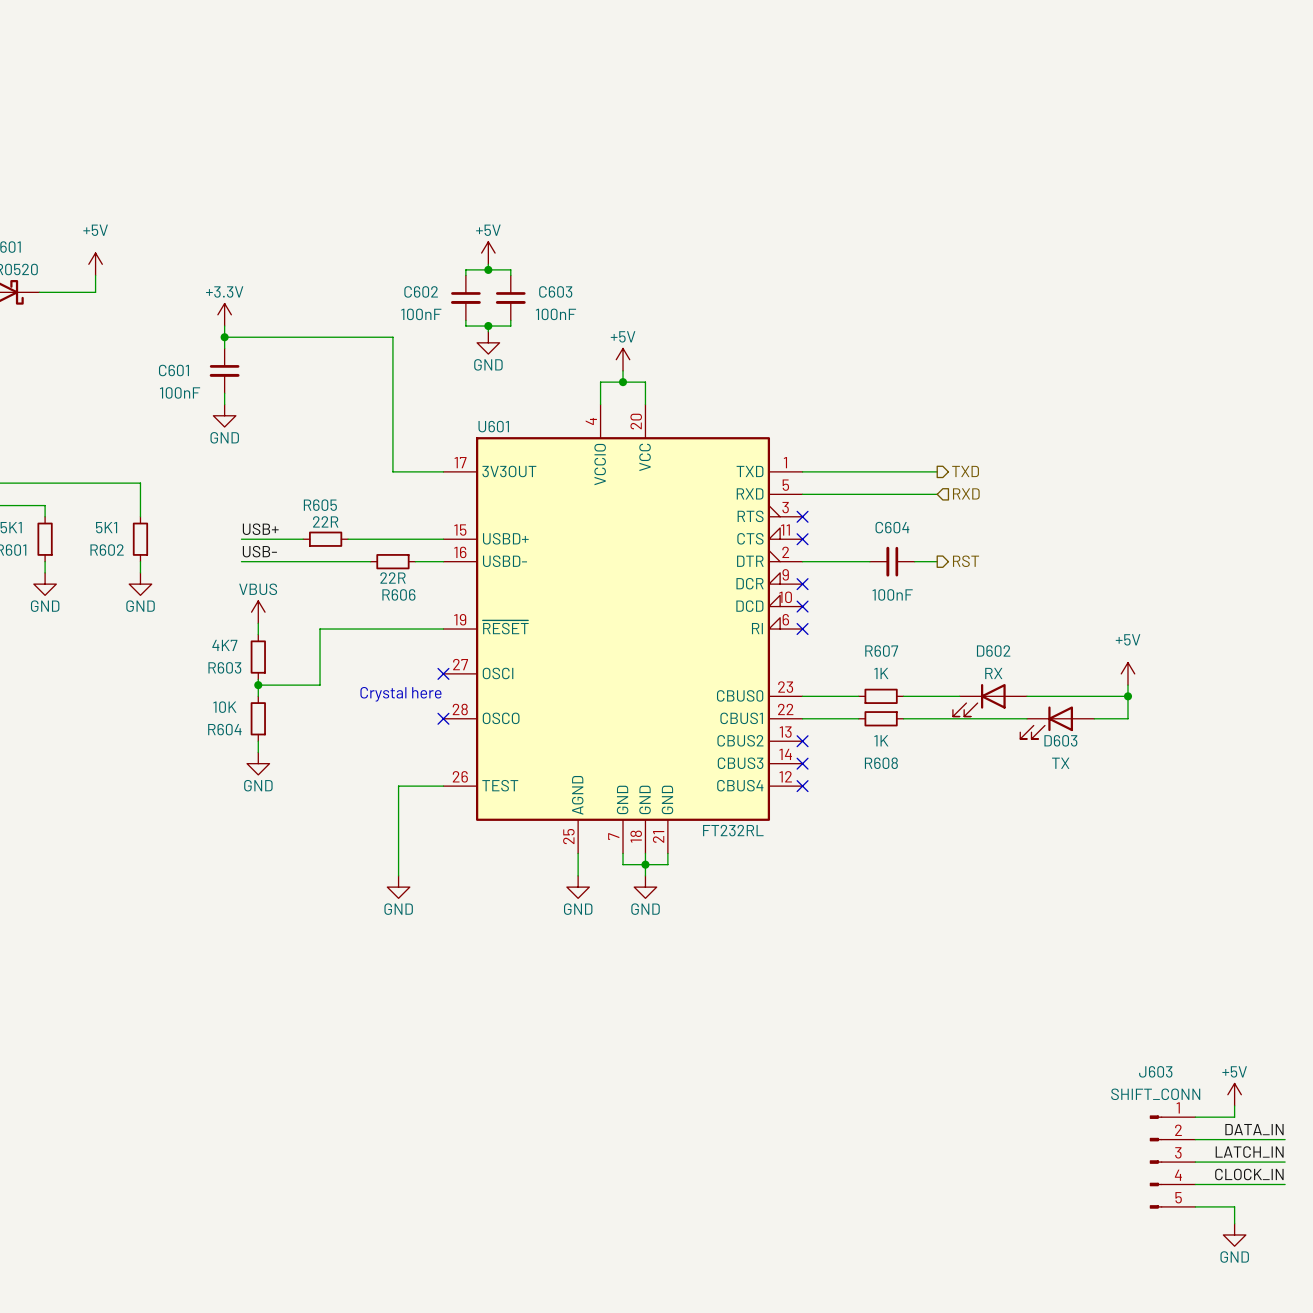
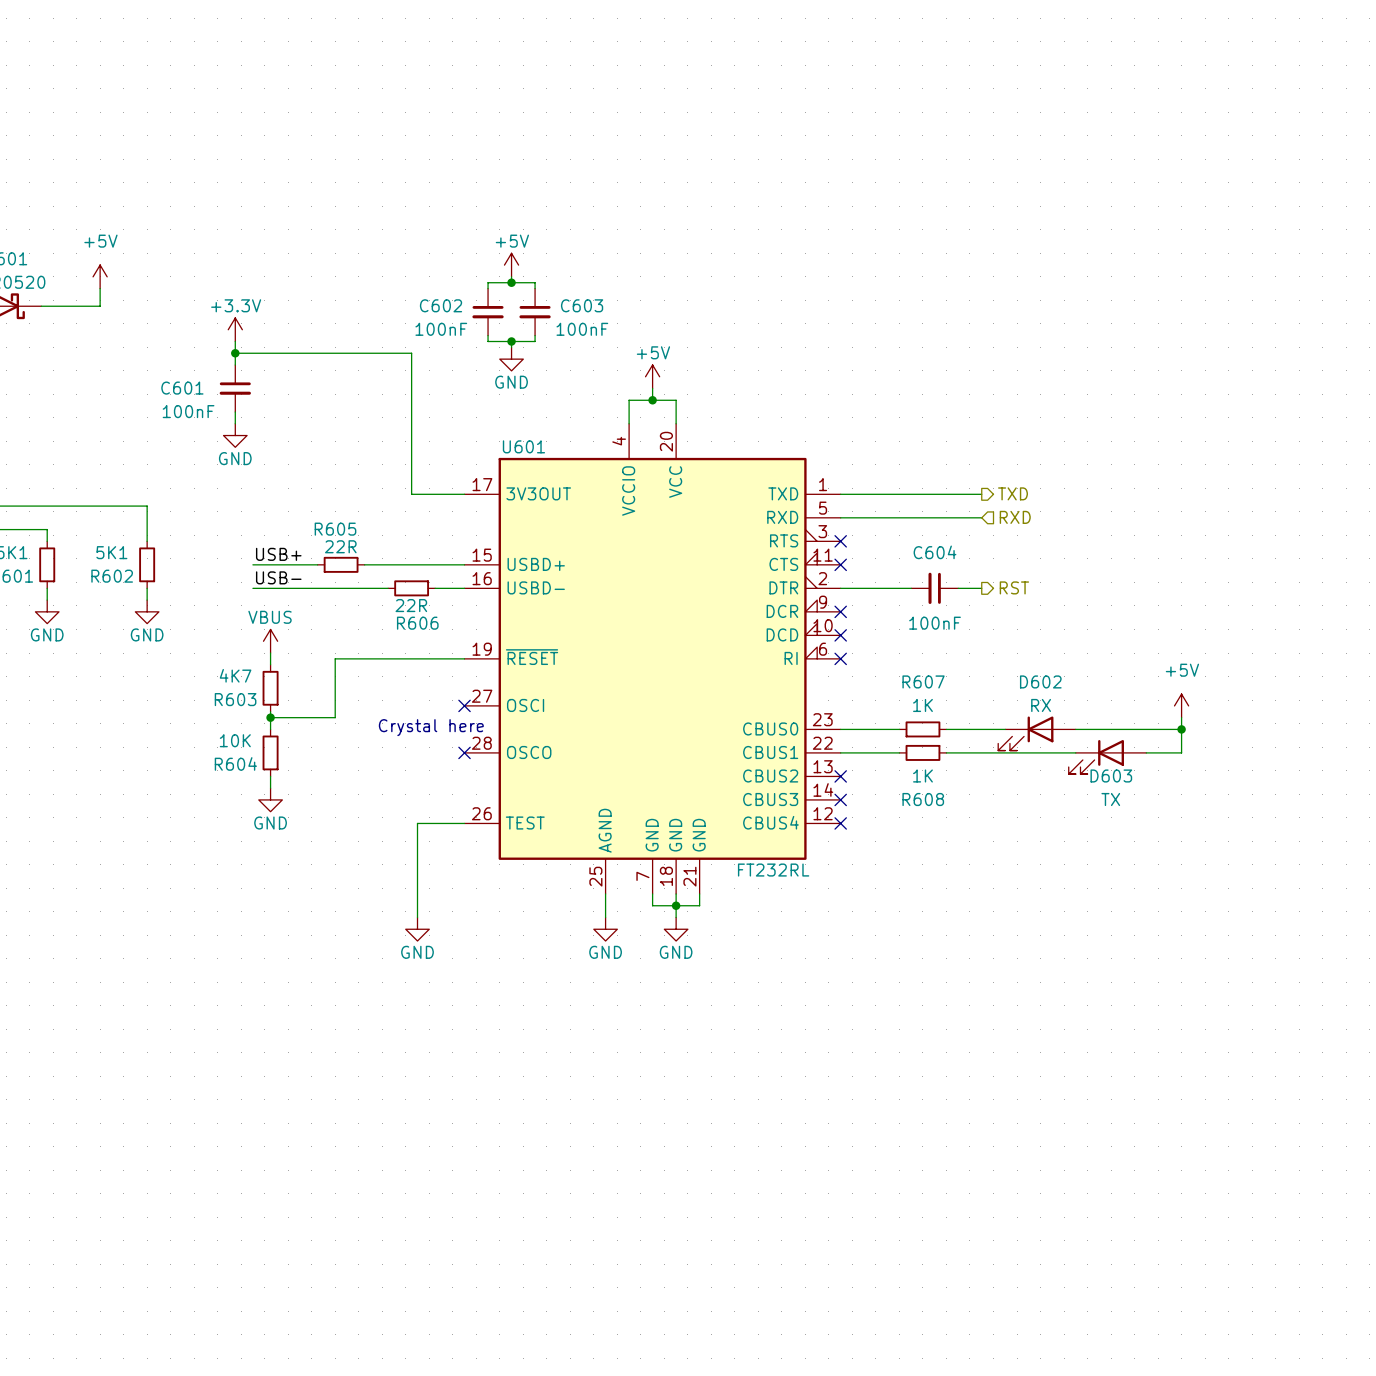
power symbol: +5V (1234, 1094) -> none
wire: (1234, 1105) (1234, 1117) (1195, 1117) -> none
label: DATA_IN (1254, 1129) -> none
wire: (1195, 1139) (1285, 1139) -> none
label: LATCH_IN (1249, 1152) -> none
J603: SHIFT_CONN (1172, 1162) -> none
wire: (1195, 1162) (1285, 1162) -> none
label: CLOCK_IN (1249, 1174) -> none
wire: (1195, 1184) (1285, 1184) -> none
wire: (1195, 1206) (1234, 1206) (1234, 1223) -> none
power symbol: GND (1234, 1234) -> none

